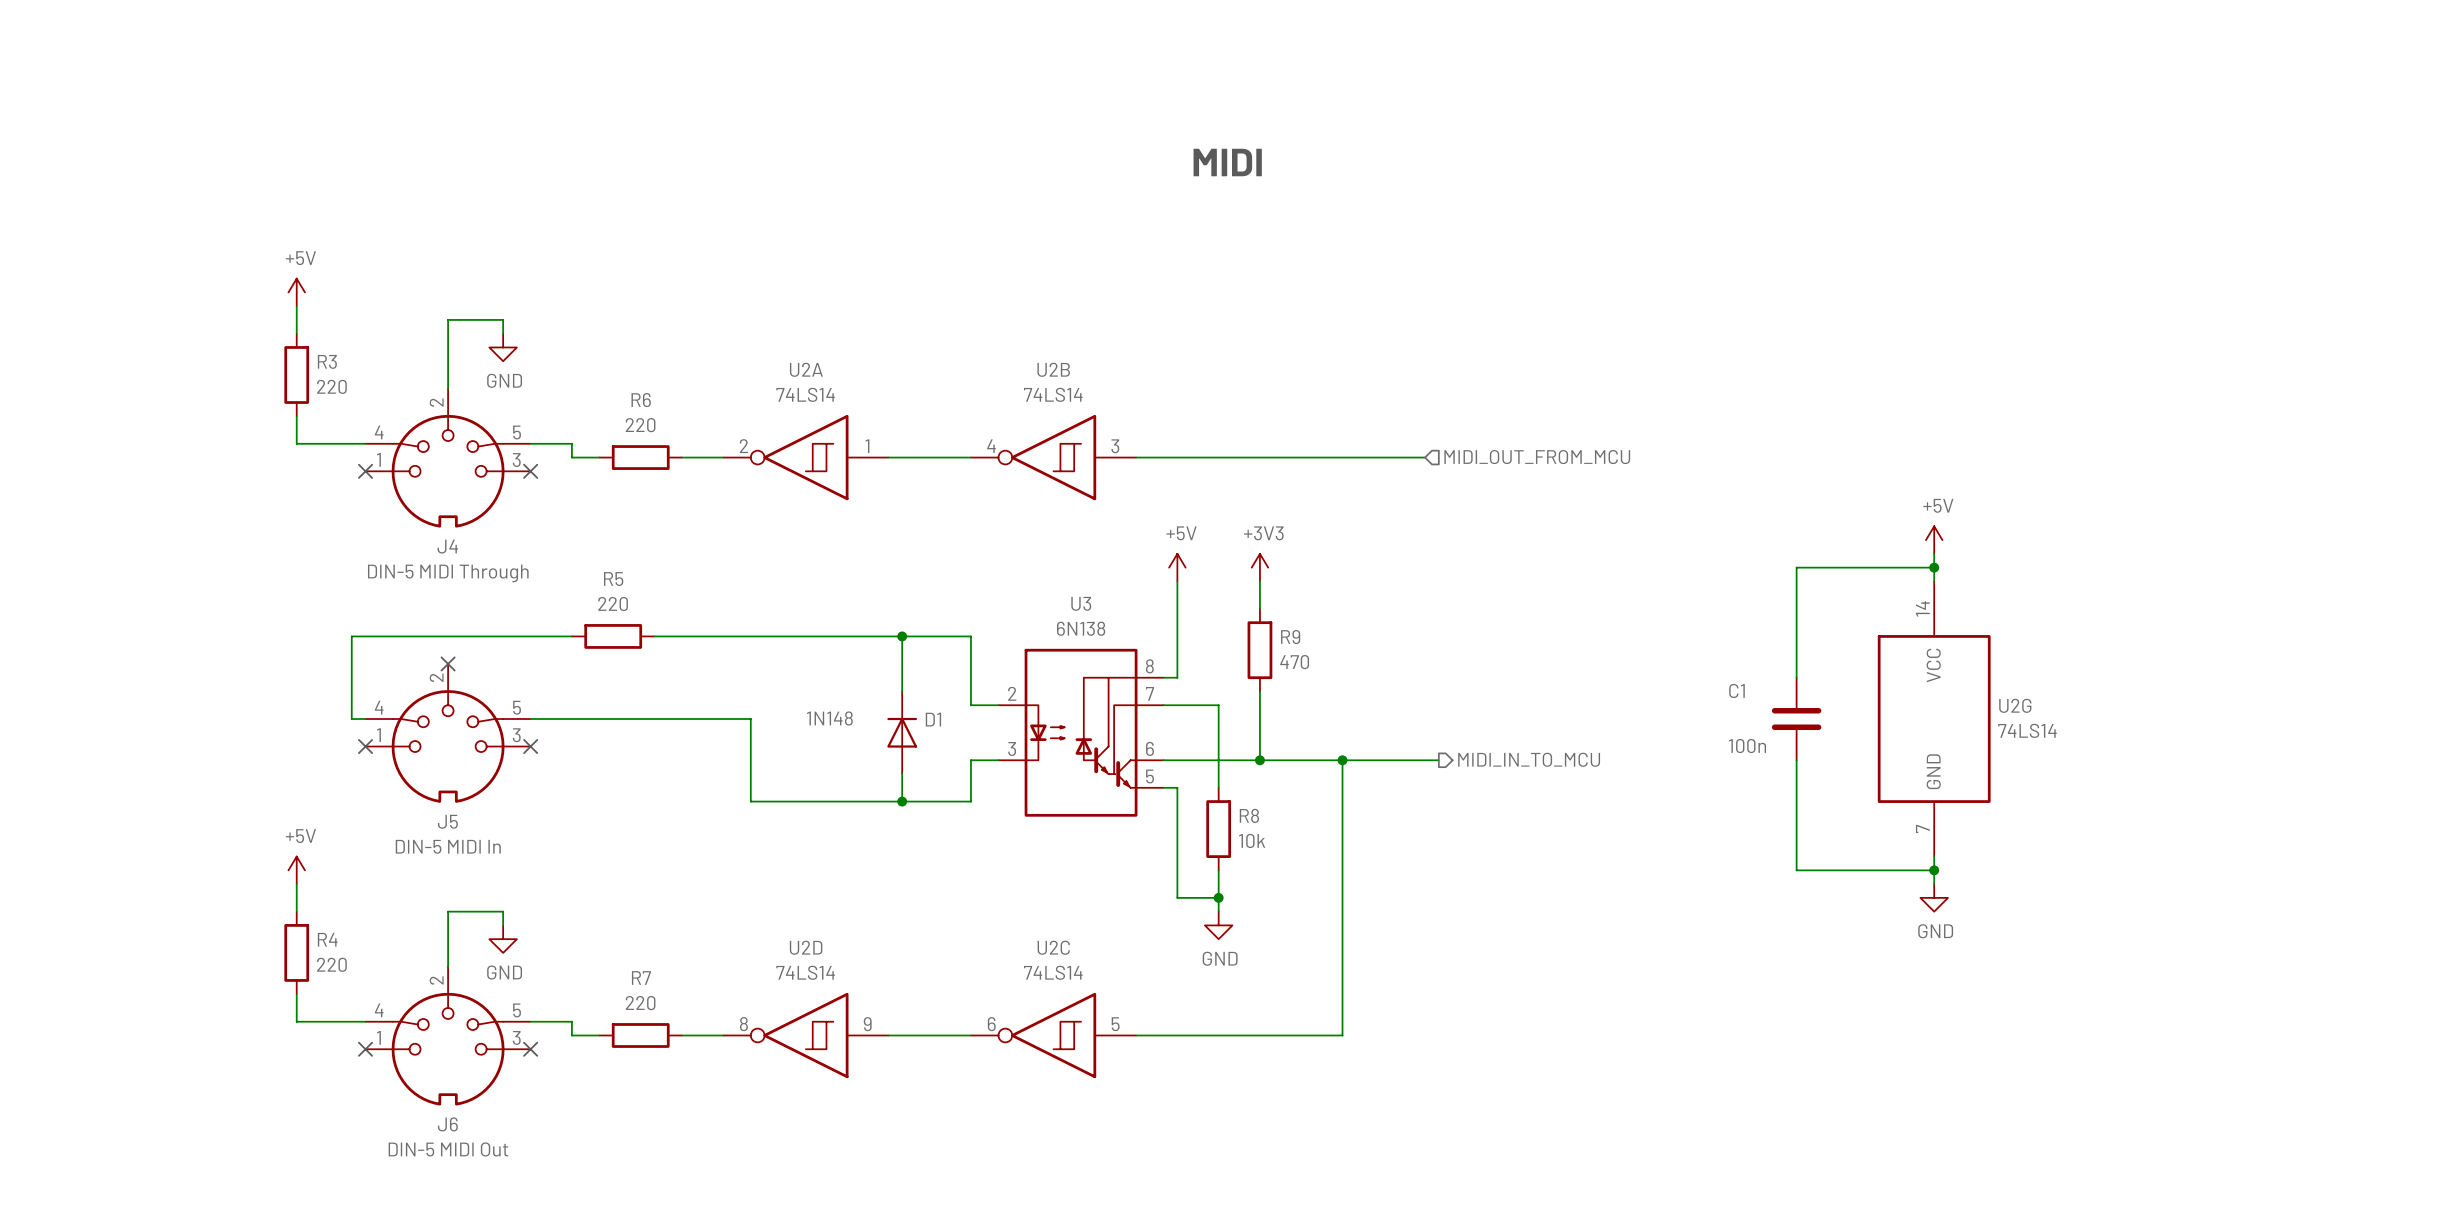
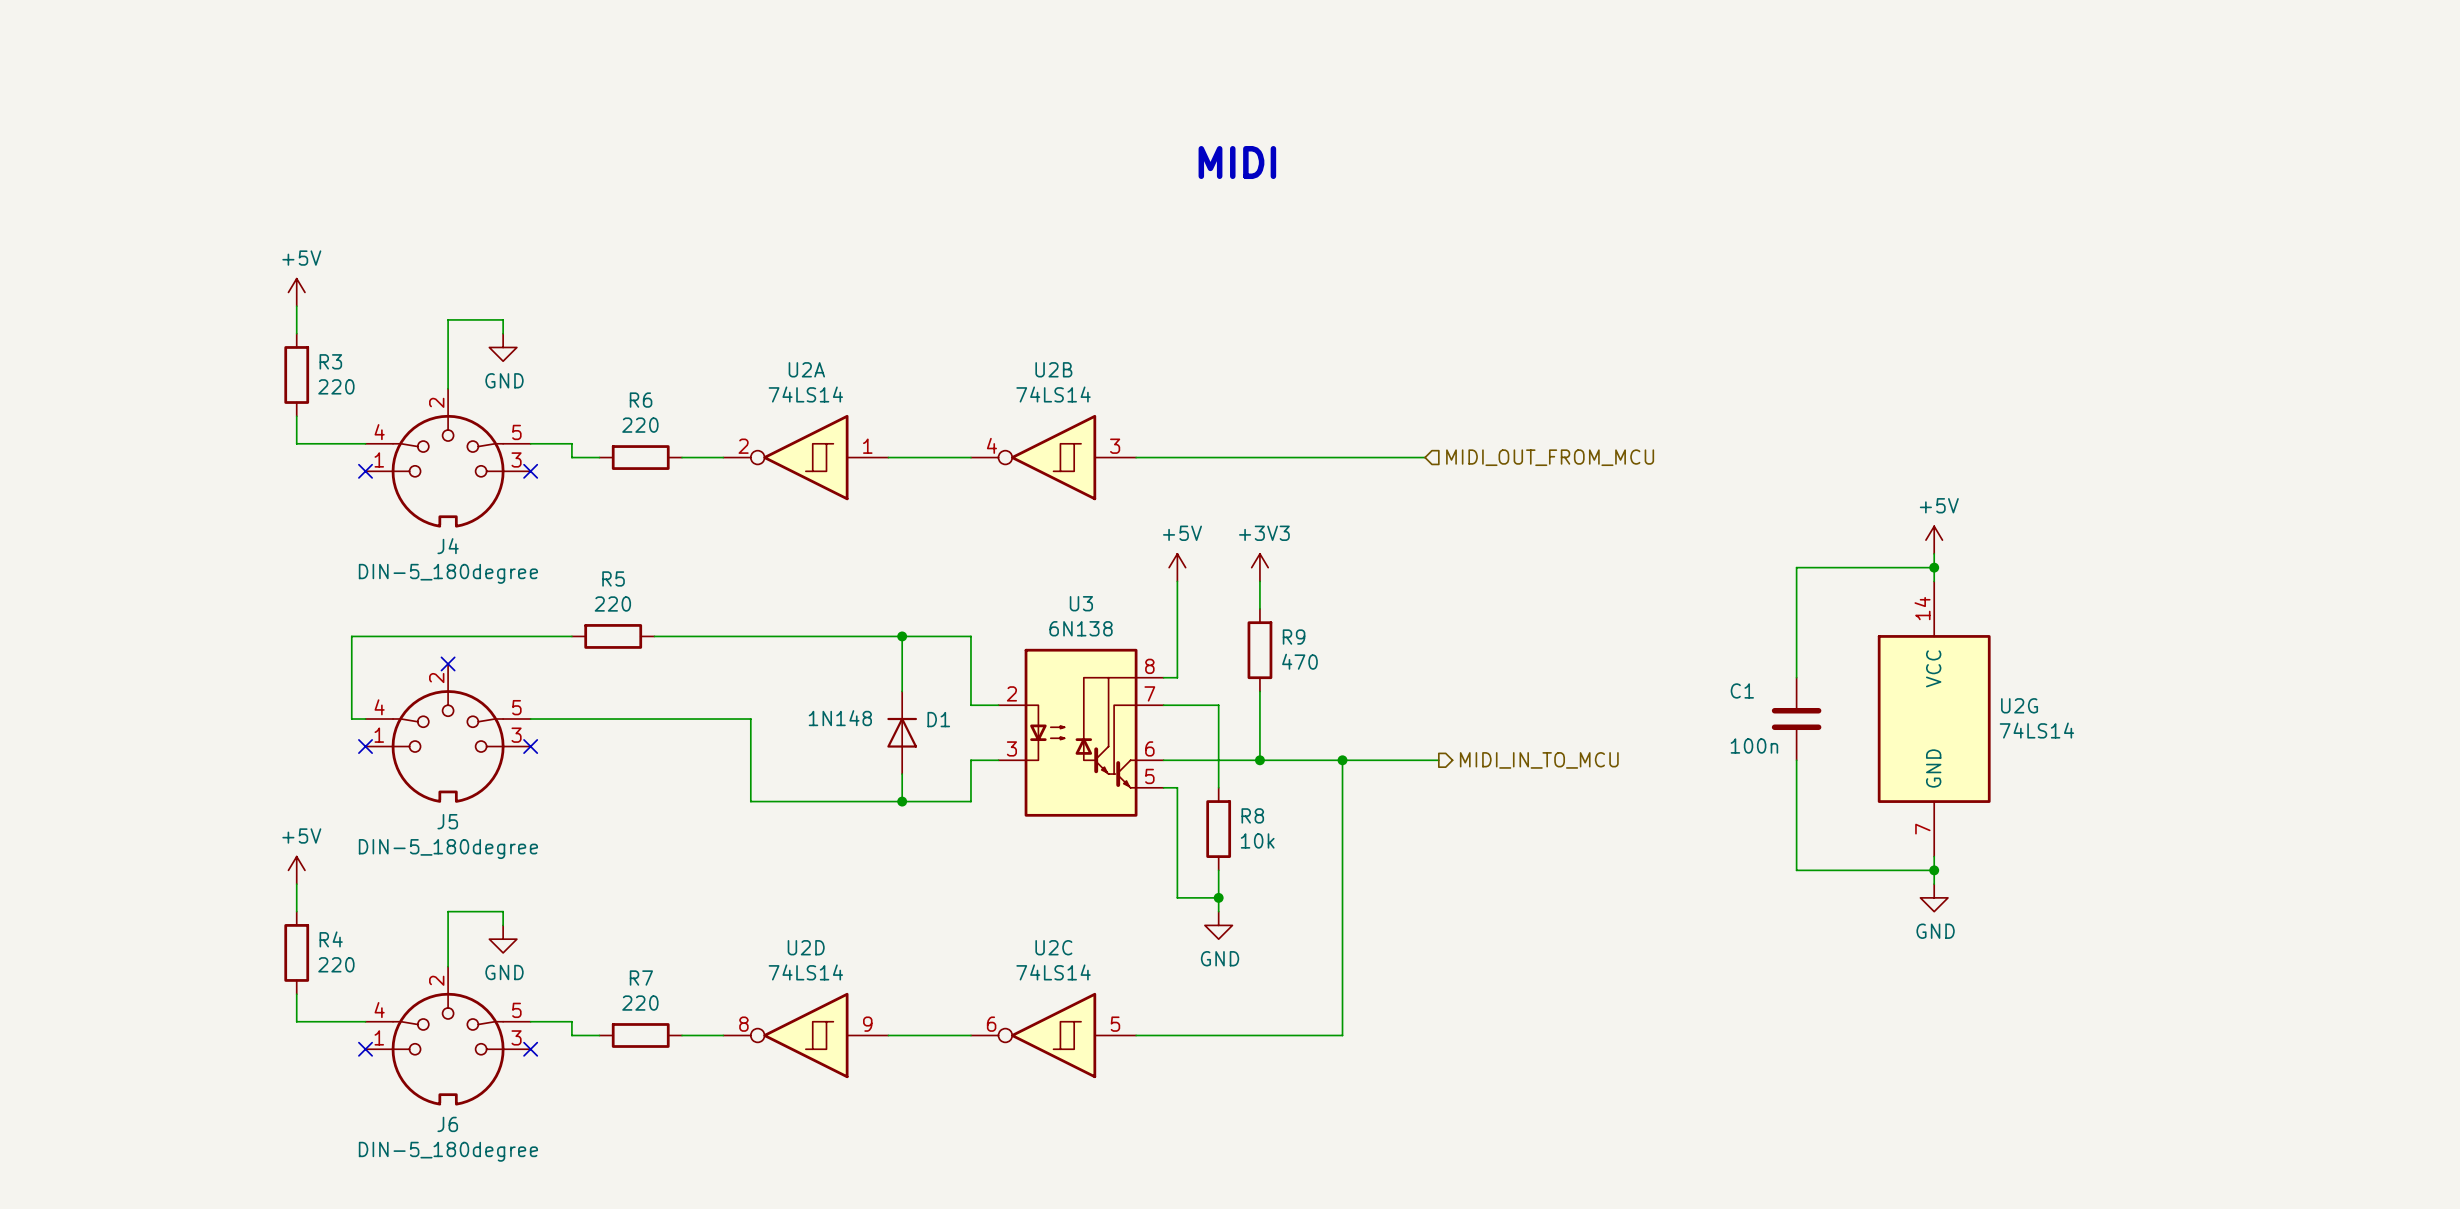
J4 value: DIN-5 MIDI Through (448, 573) -> DIN-5_180degree (448, 573)
J5 value: DIN-5 MIDI In (448, 846) -> DIN-5_180degree (448, 849)
J6 value: DIN-5 MIDI Out (448, 1149) -> DIN-5_180degree (448, 1151)

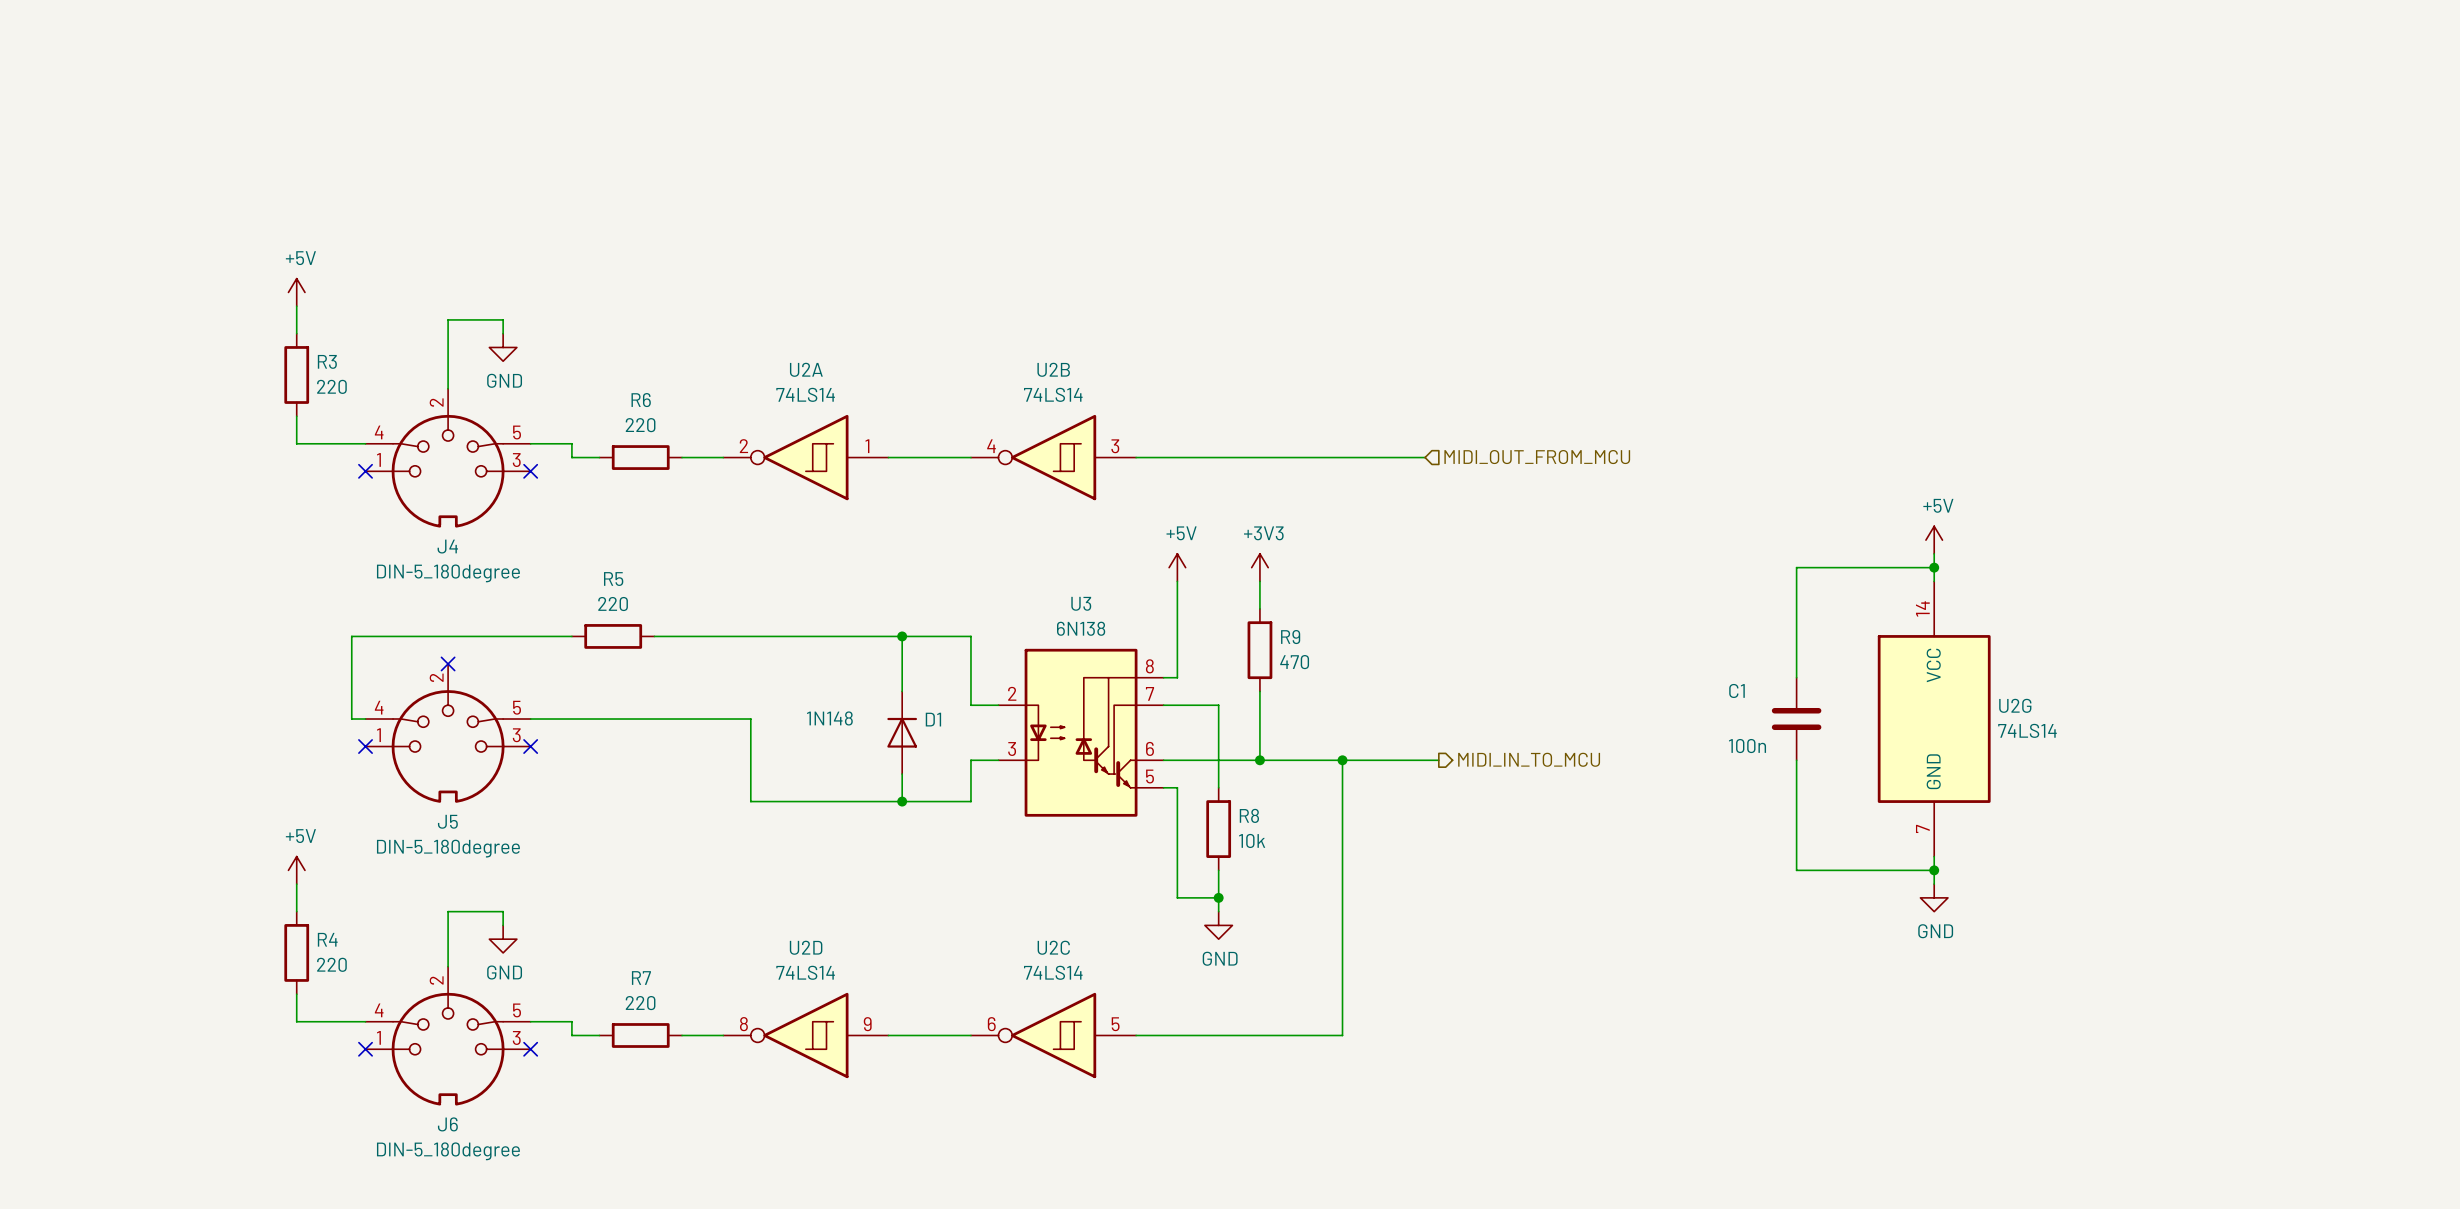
text: MIDI (1237, 162) -> none

